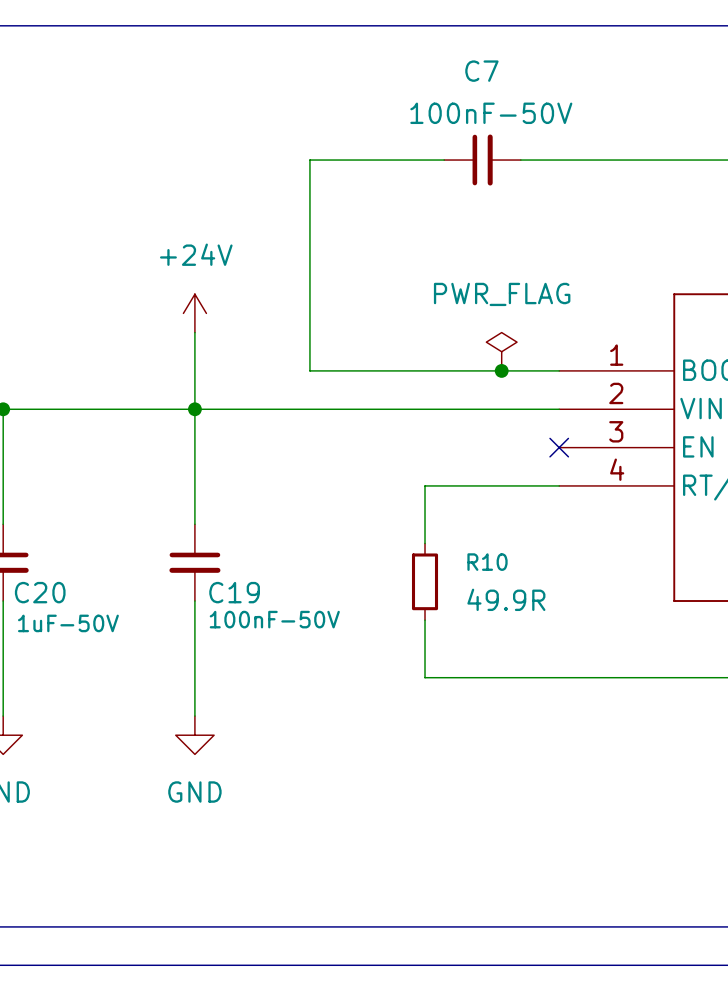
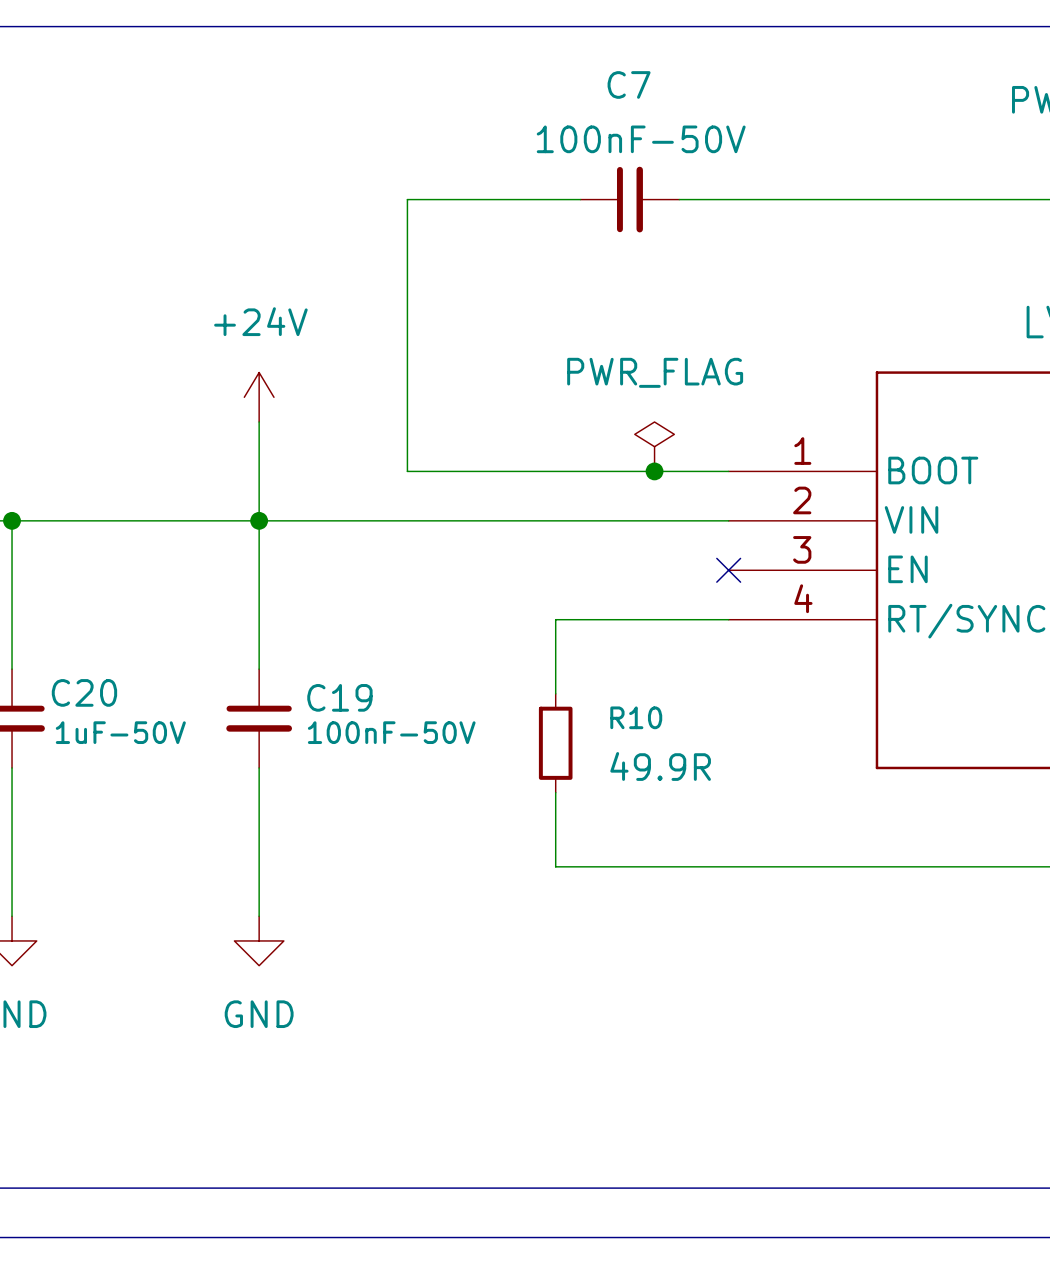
C20 name position: C20 (40, 592) -> C20 (84, 692)
C19 name position: C19 (234, 592) -> C19 (339, 697)
C19 value position: 100nF-50V (274, 619) -> 100nF-50V (391, 732)
C20 value position: 1uF-50V (68, 623) -> 1uF-50V (120, 732)

